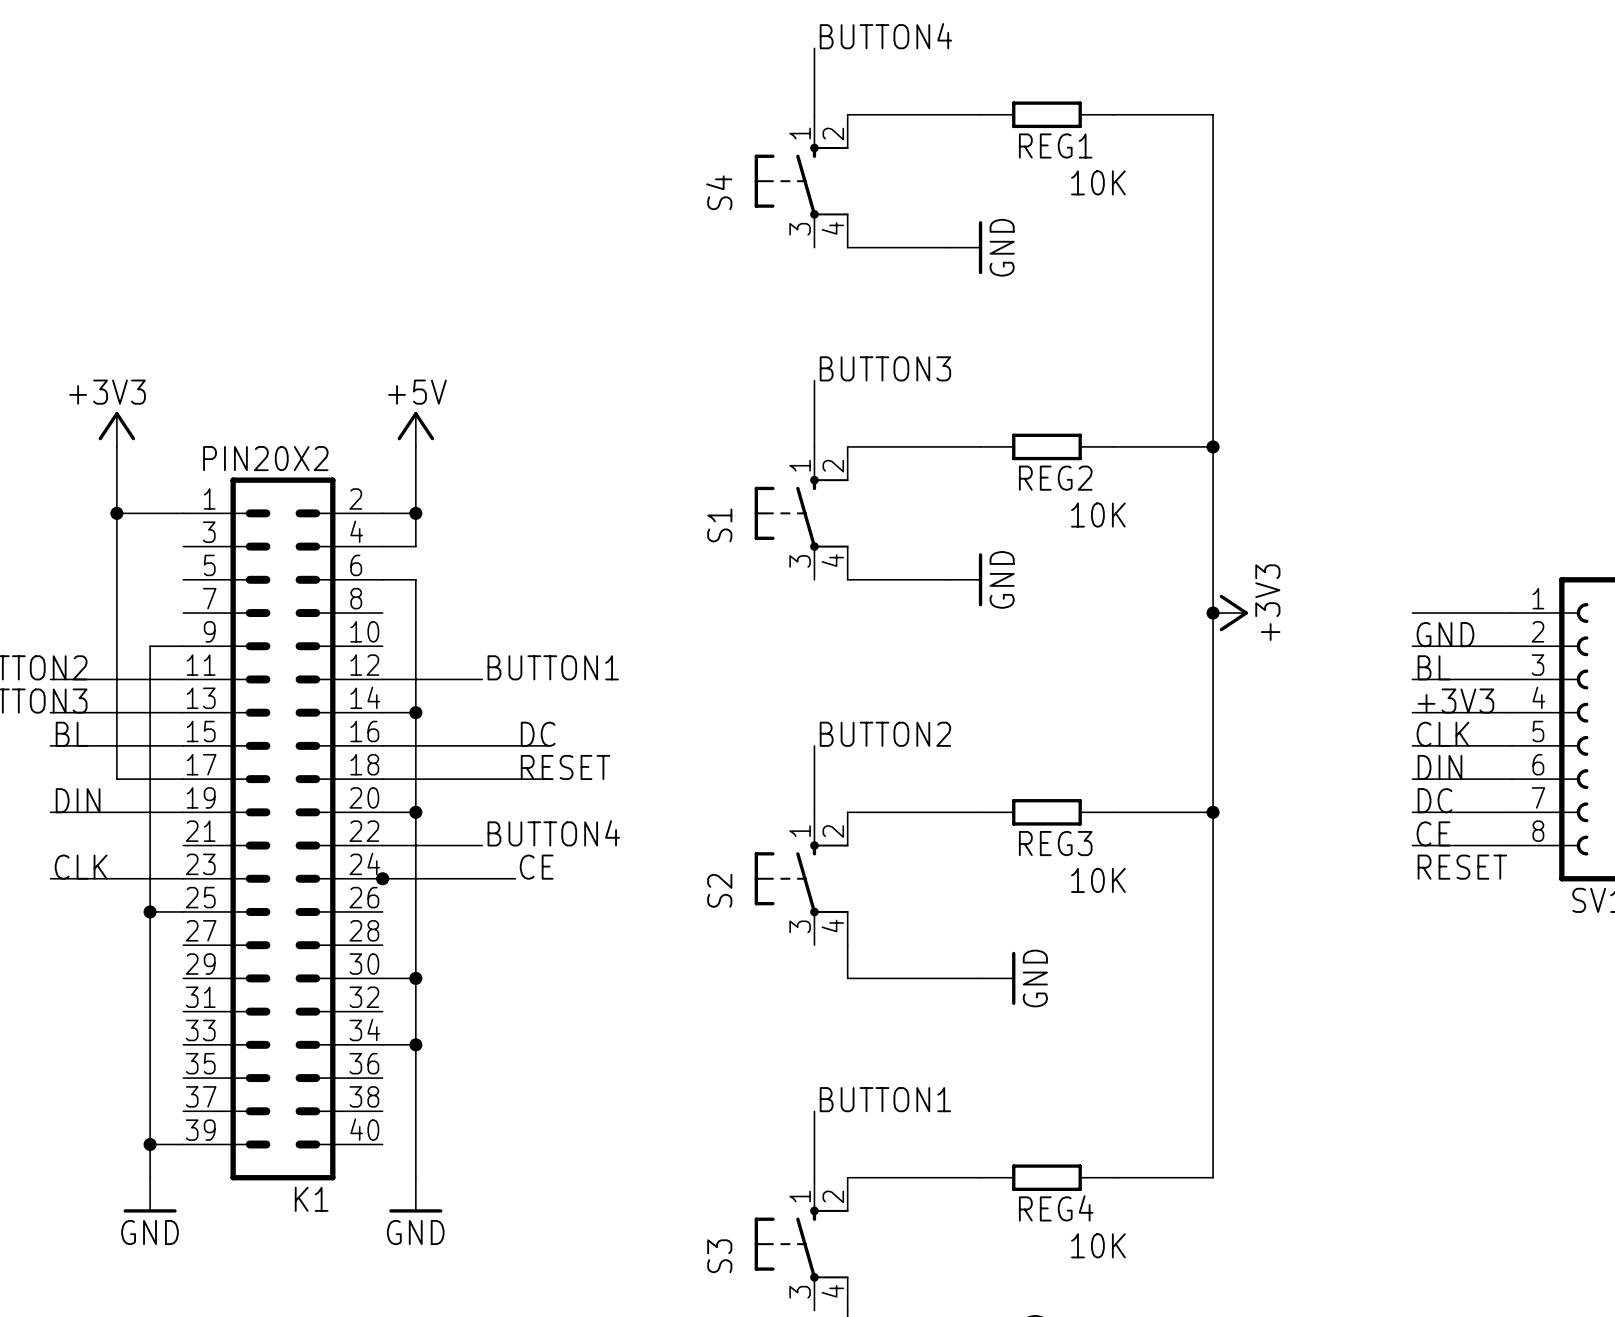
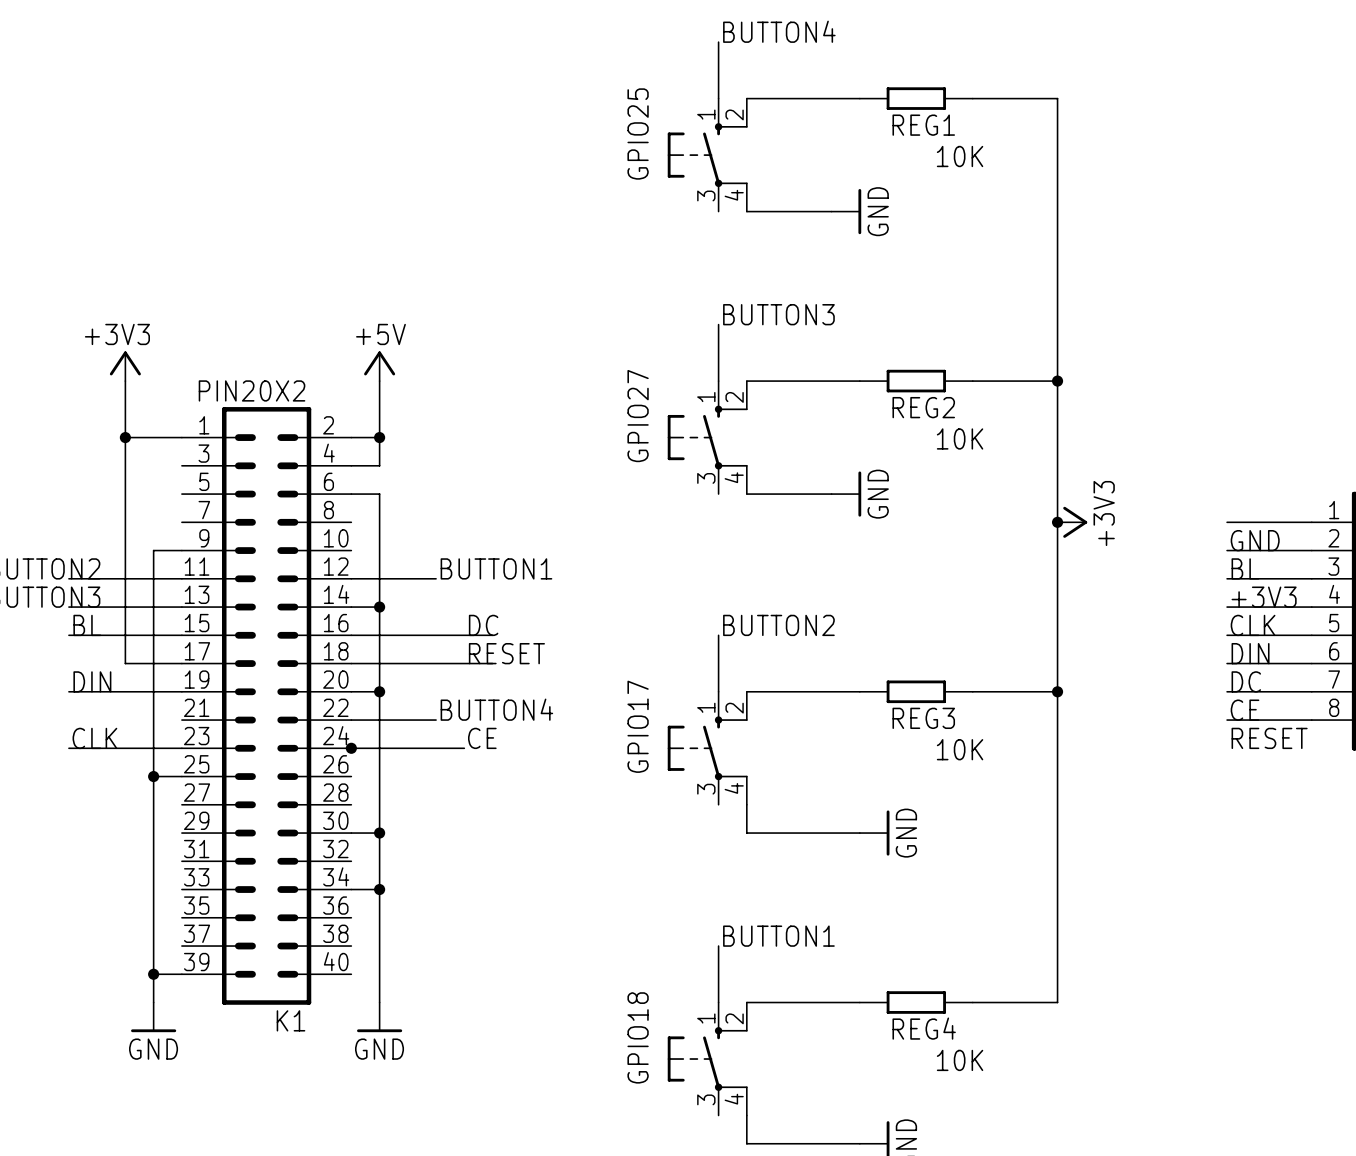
S4 name: S4 (719, 192) -> GPIO25 (638, 134)
S1 name: S1 (719, 525) -> GPIO27 (638, 416)
S2 name: S2 (719, 890) -> GPIO17 (638, 726)
S3 name: S3 (719, 1256) -> GPIO18 (638, 1037)

